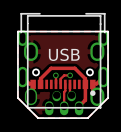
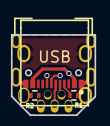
via: none -> (68, 73)
track: none -> (64, 83) (64, 87) (69, 95)
track: (85, 83) (85, 100) (79, 106) -> none
part: none -> (34, 95)
part: none -> (73, 95)

